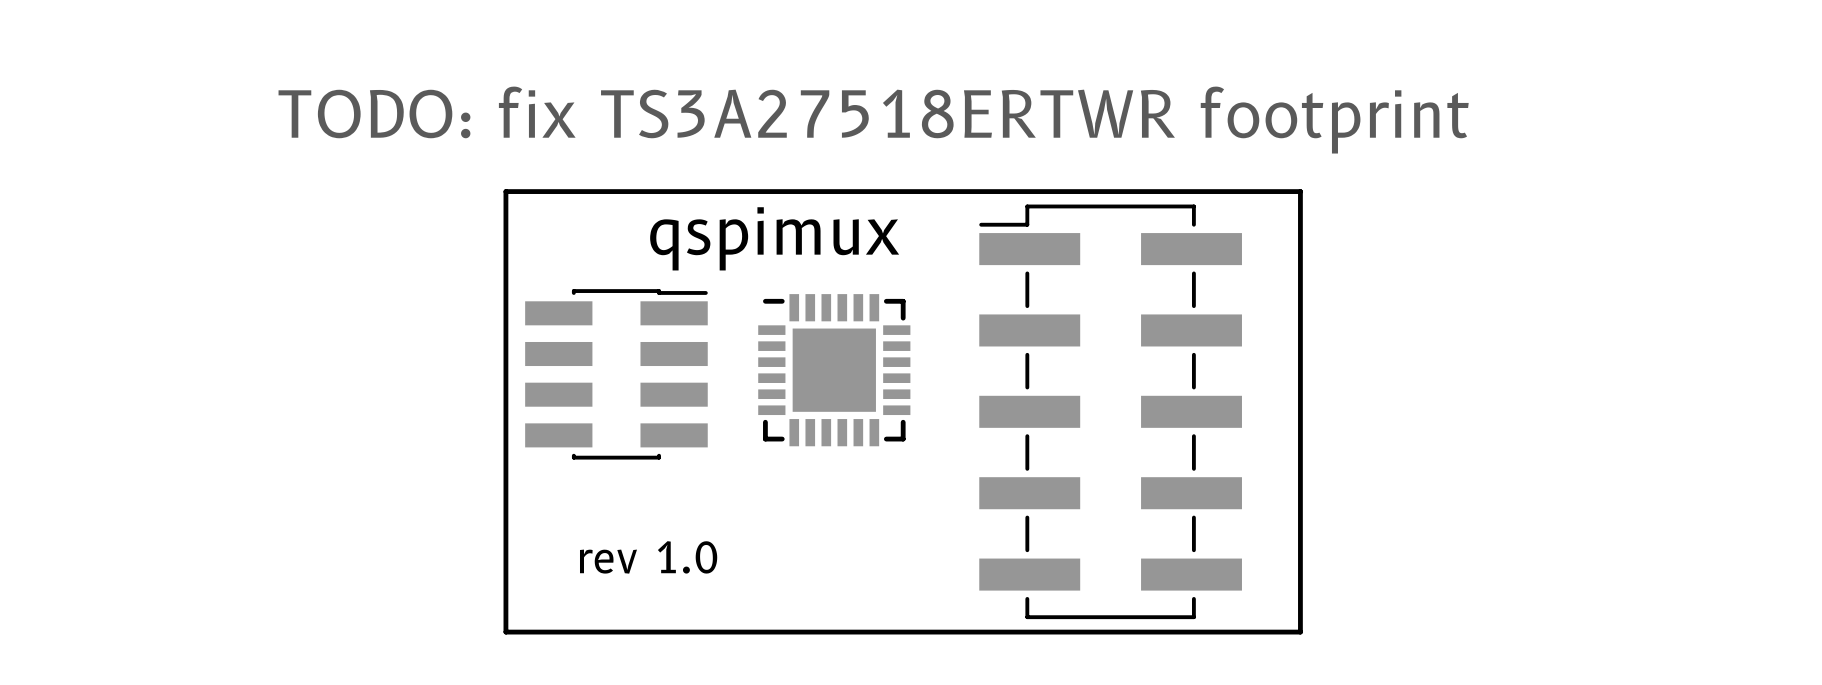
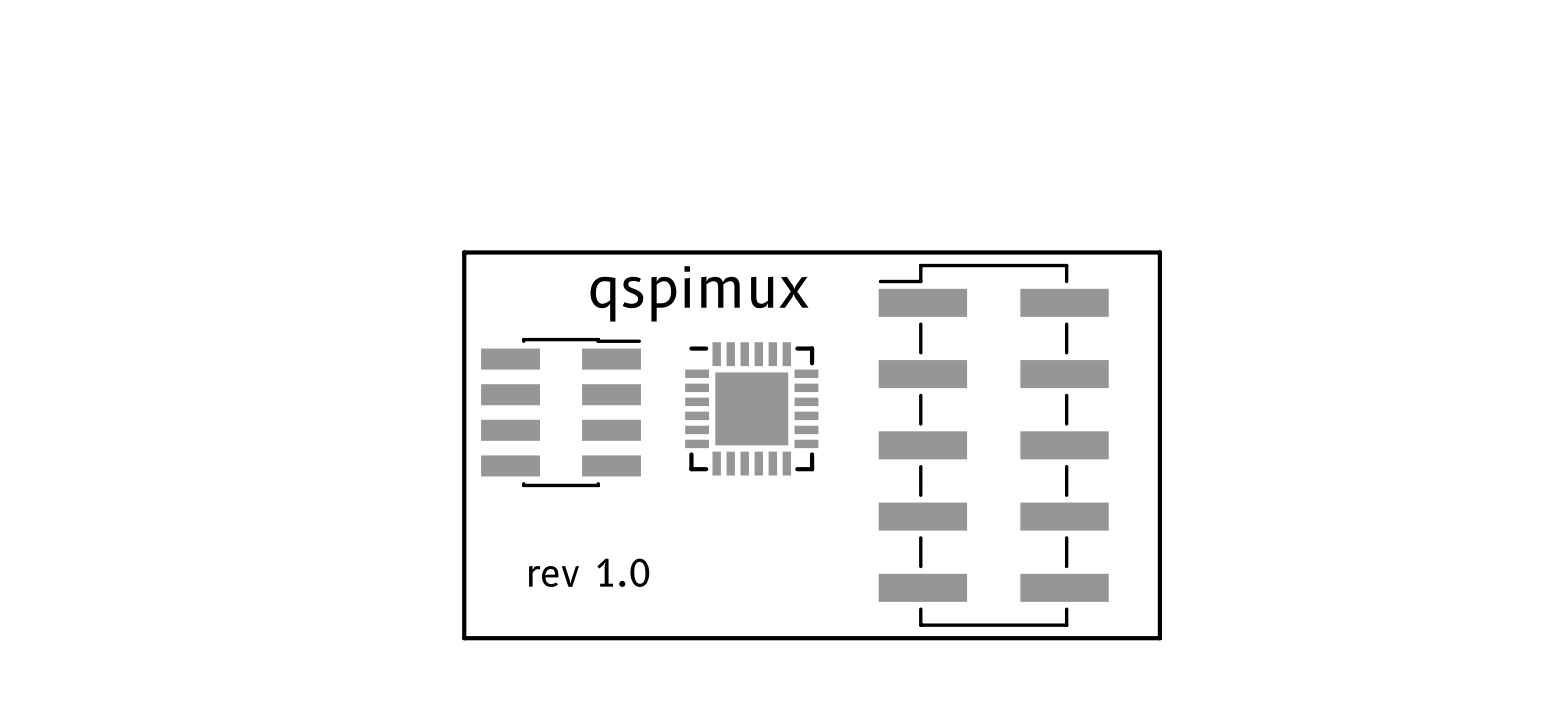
text: TODO: fix TS3A27518ERTWR footprint (873, 120) -> none

